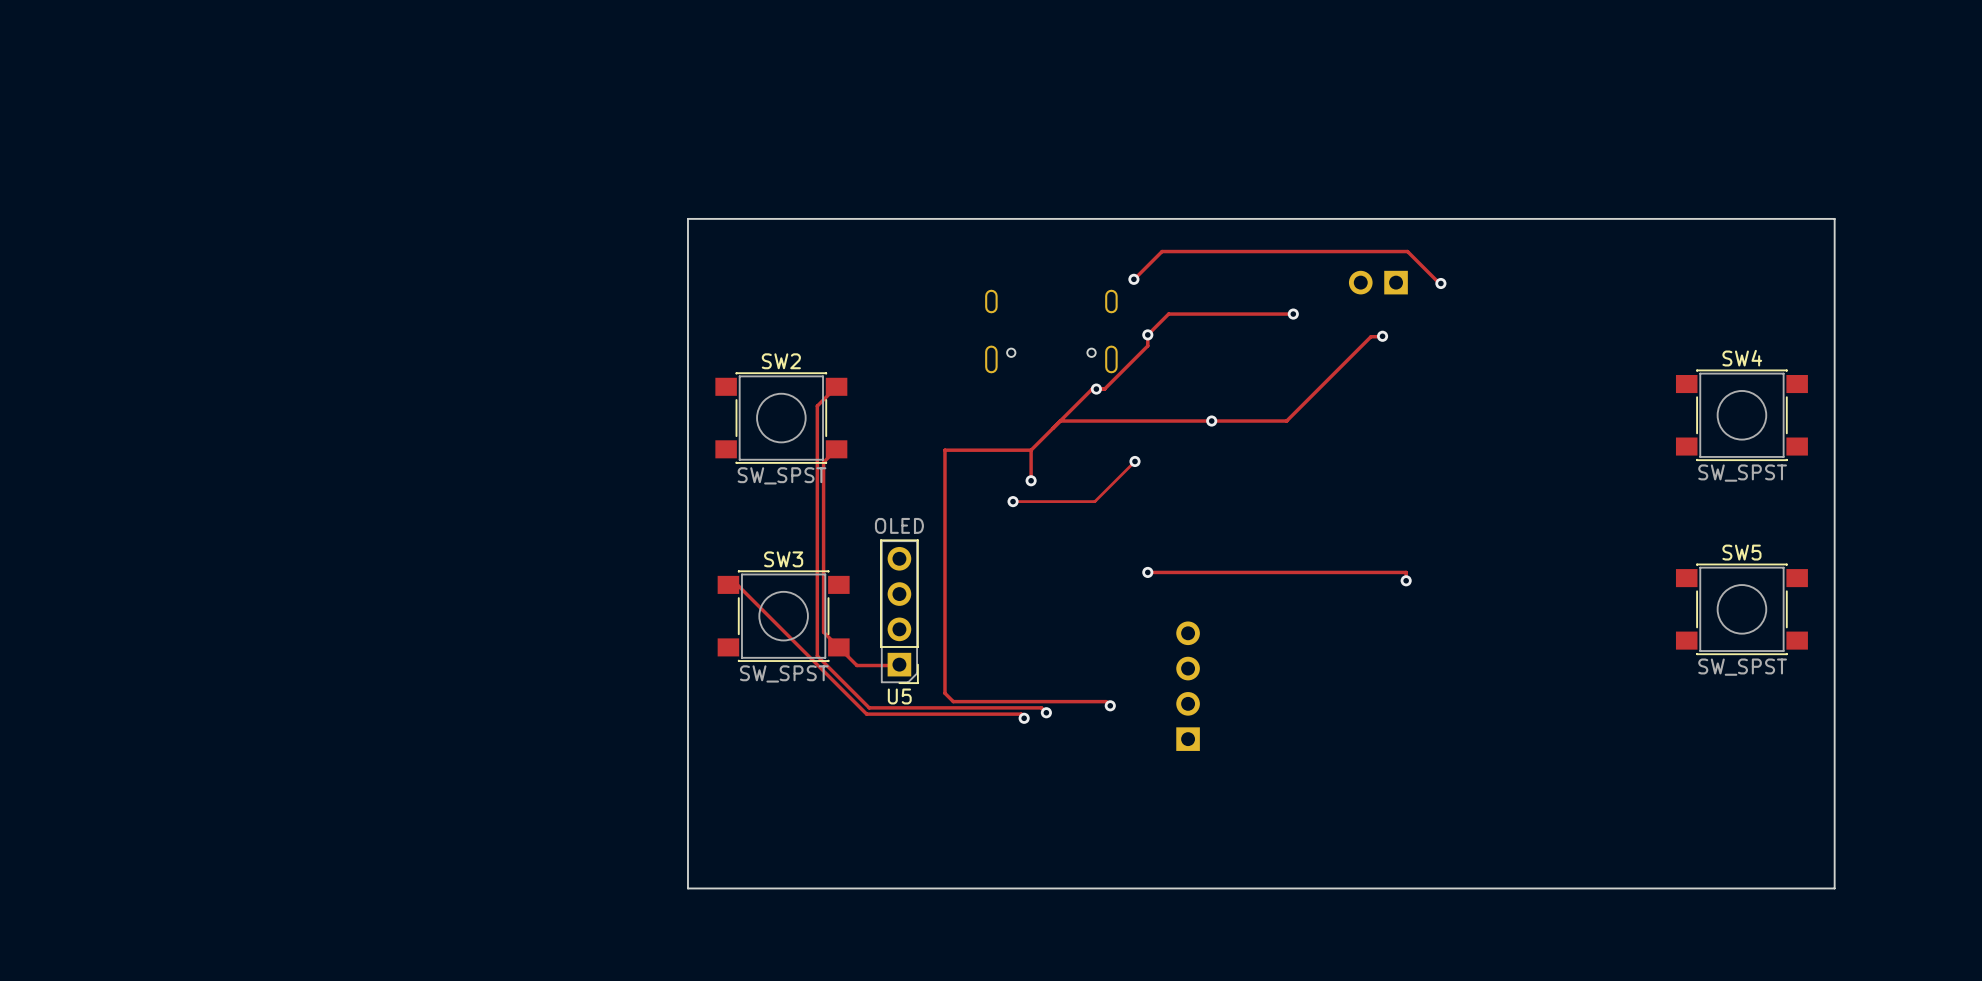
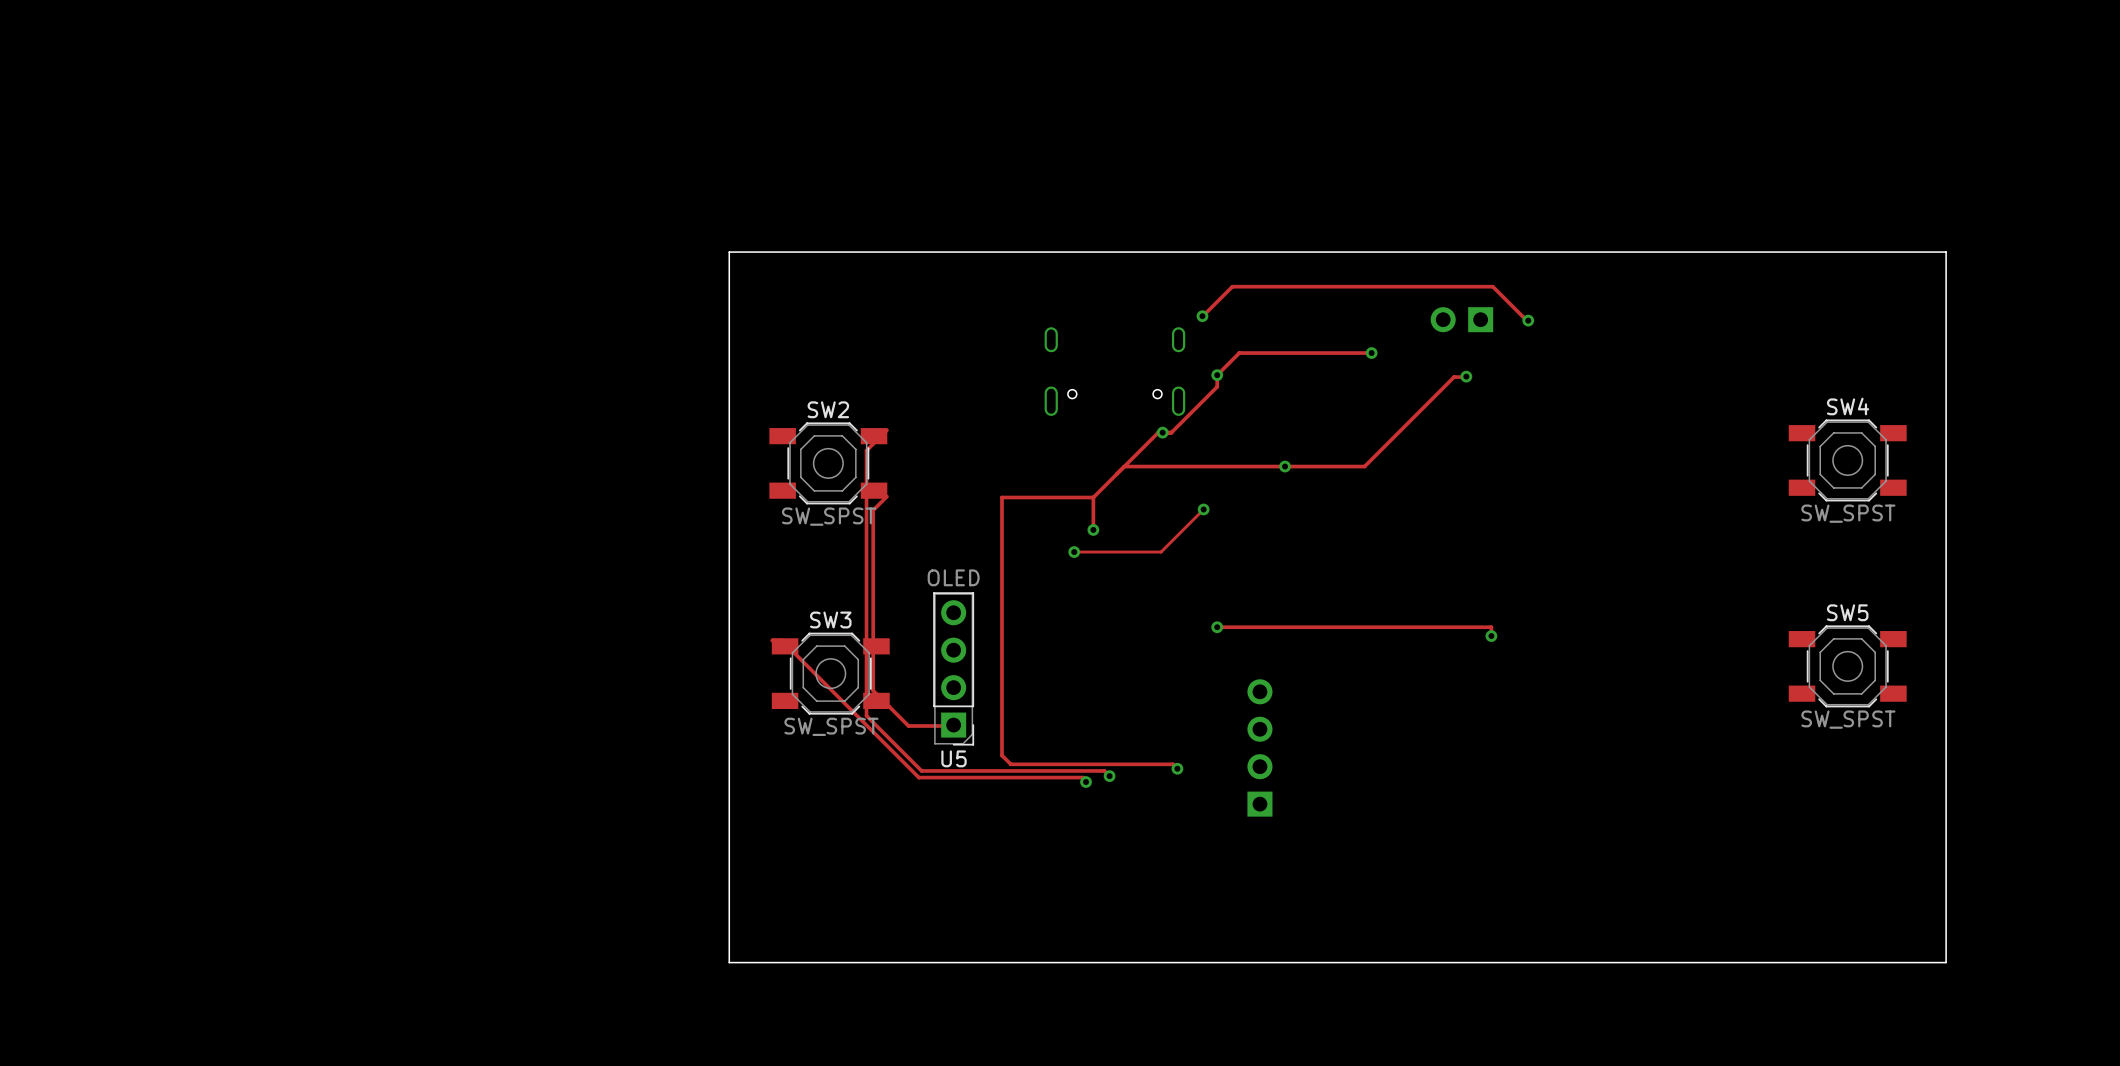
SW4 footprint: [1675, 369, 1808, 461] -> [1788, 419, 1907, 502]
SW2 footprint: [715, 372, 848, 464] -> [769, 422, 888, 505]
SW5 footprint: [1675, 563, 1808, 656] -> [1788, 625, 1907, 708]
SW3 footprint: [717, 570, 850, 662] -> [771, 632, 890, 715]

